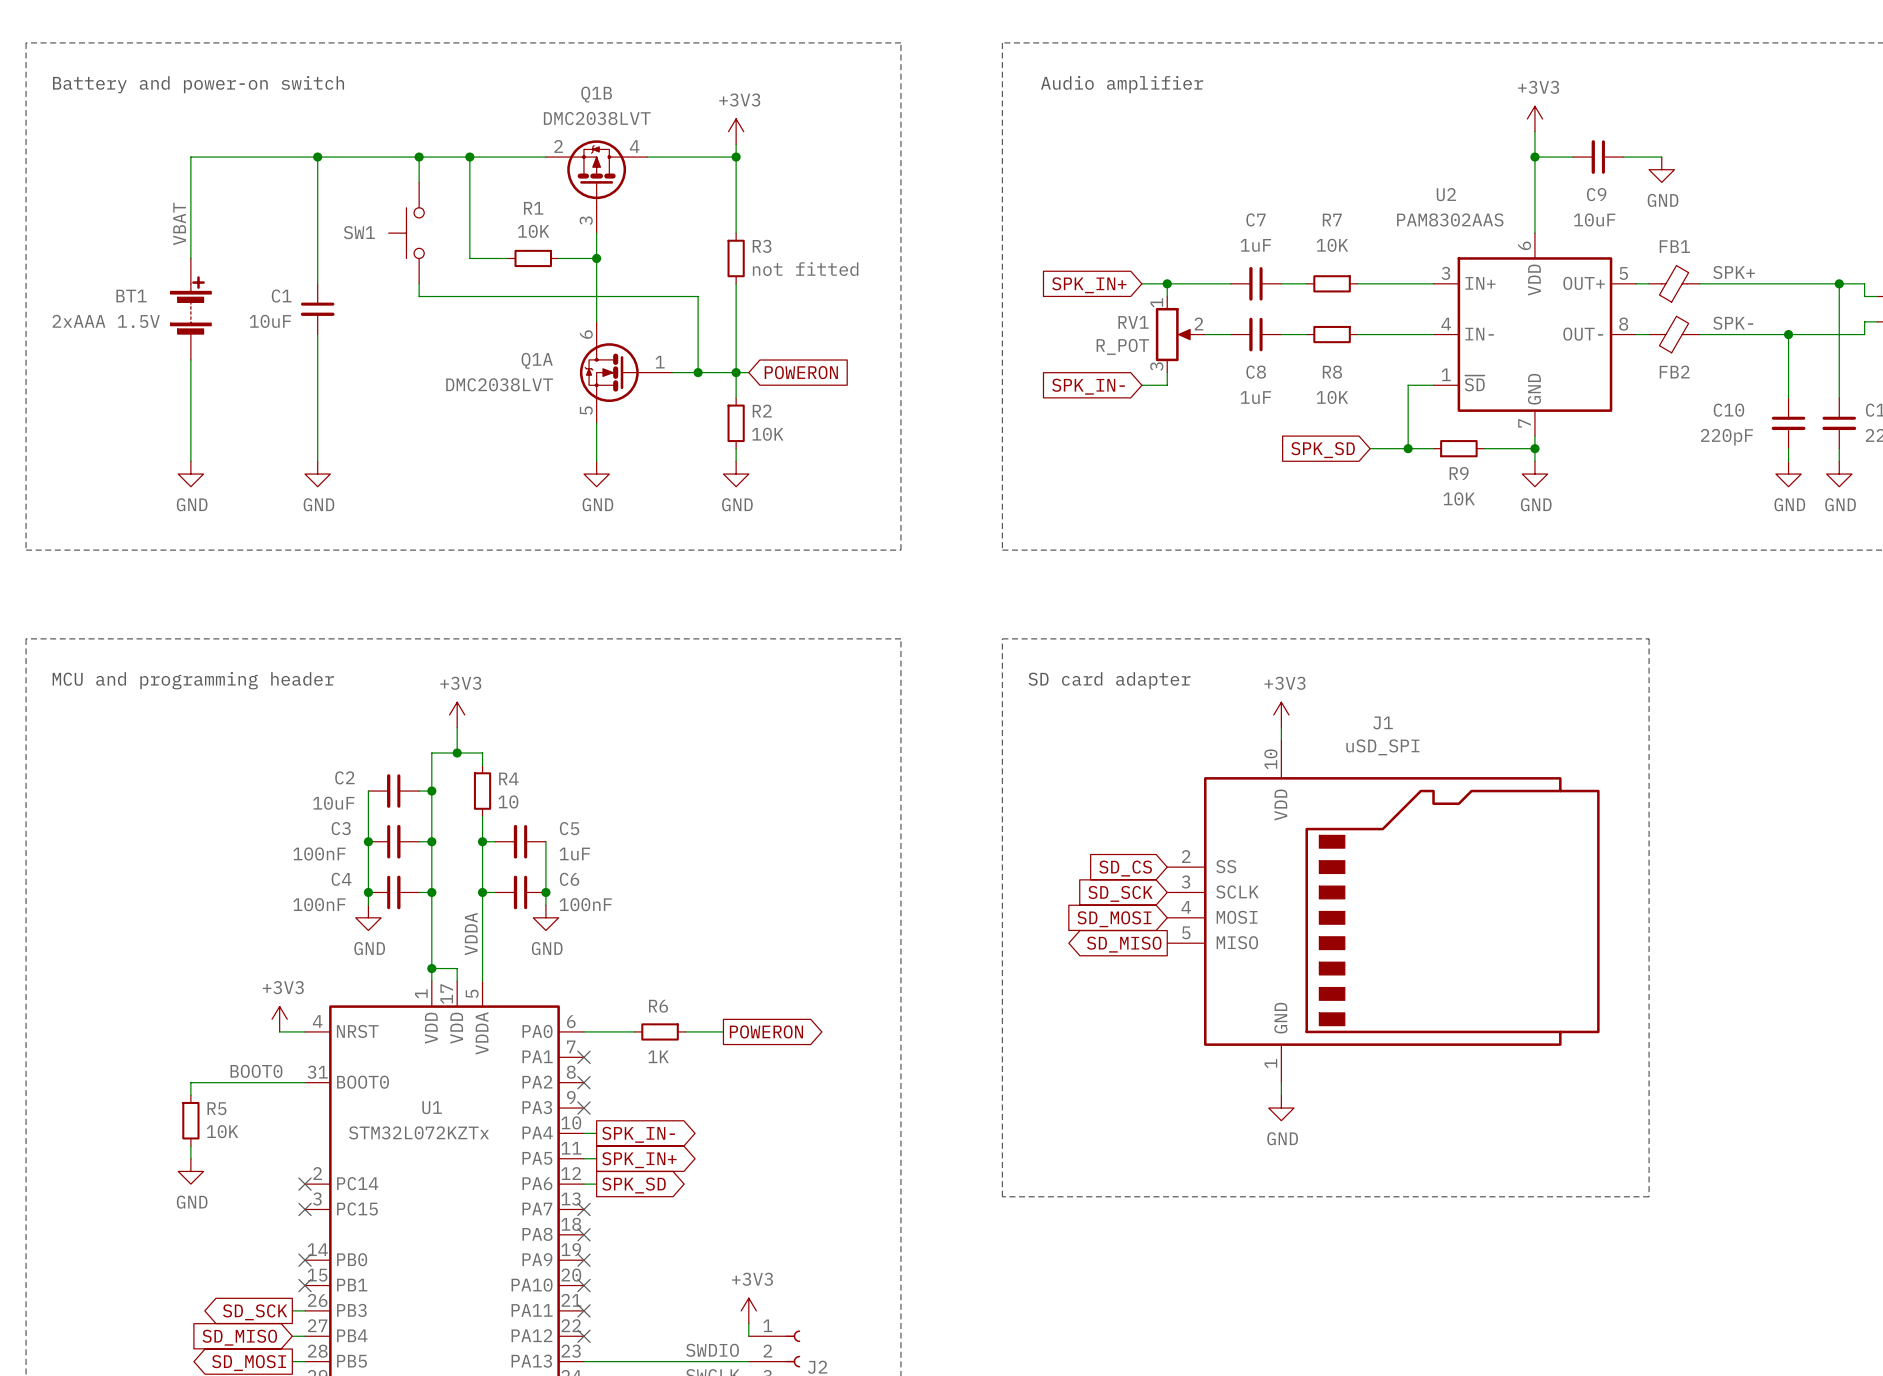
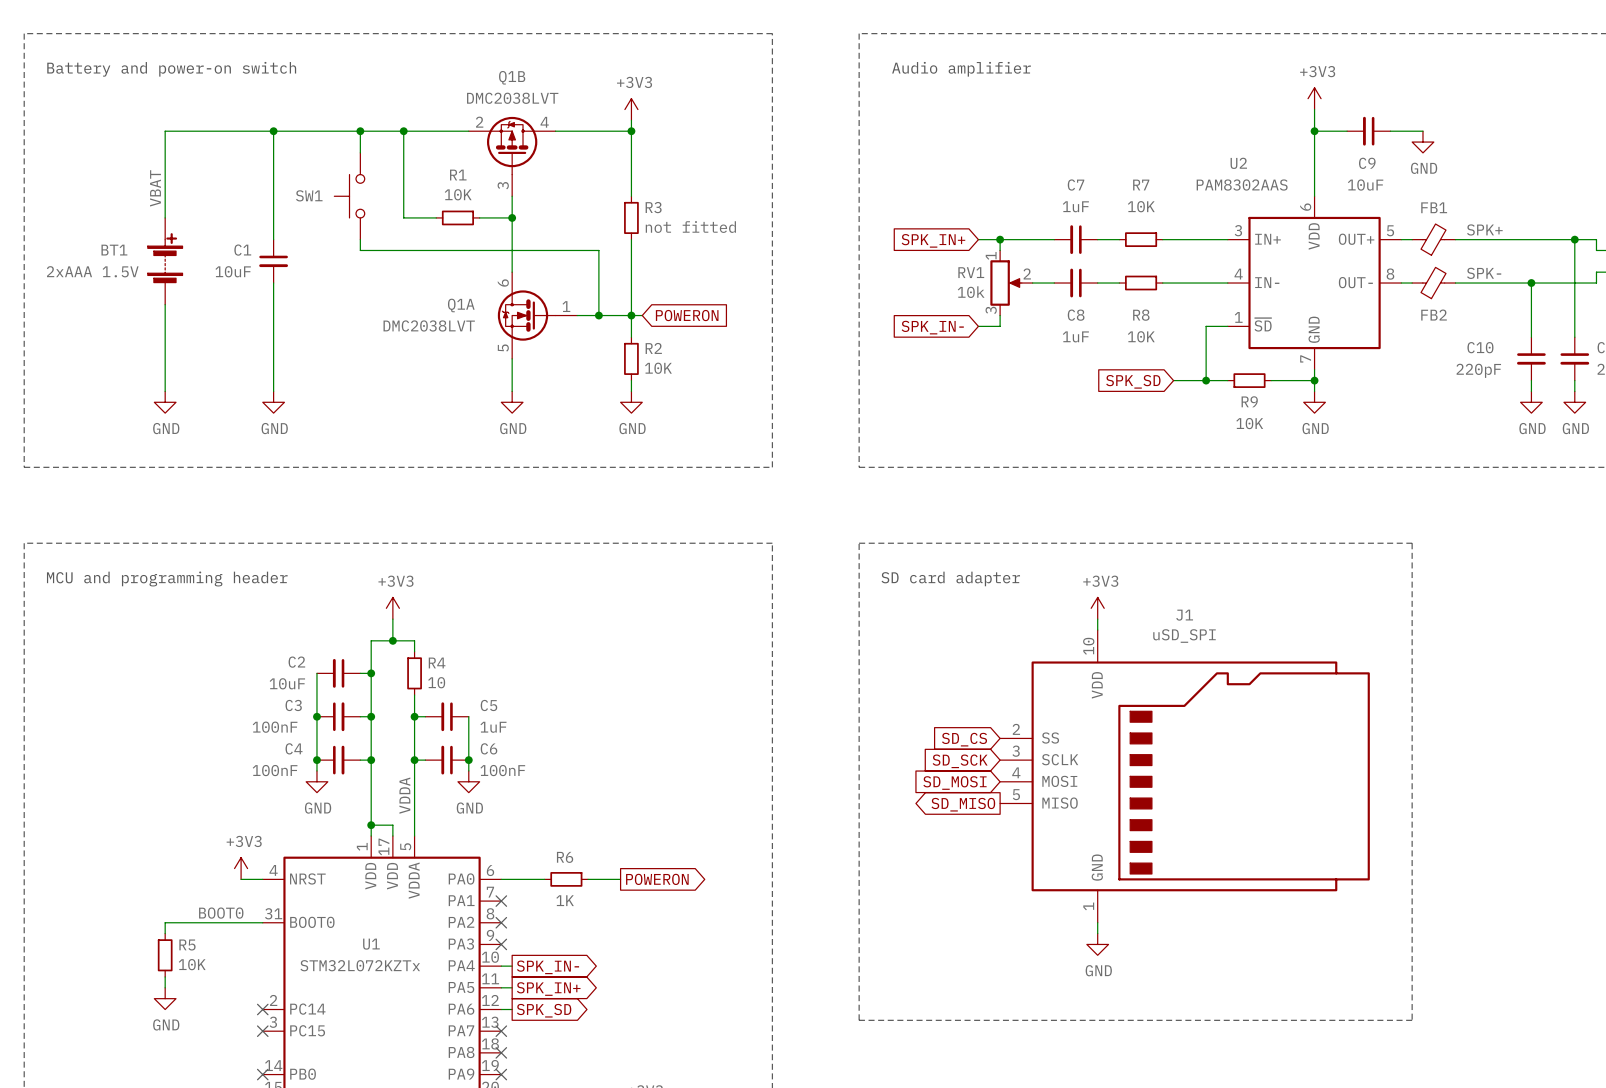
RV1 value: R_POT (1122, 346) -> 10k (971, 292)

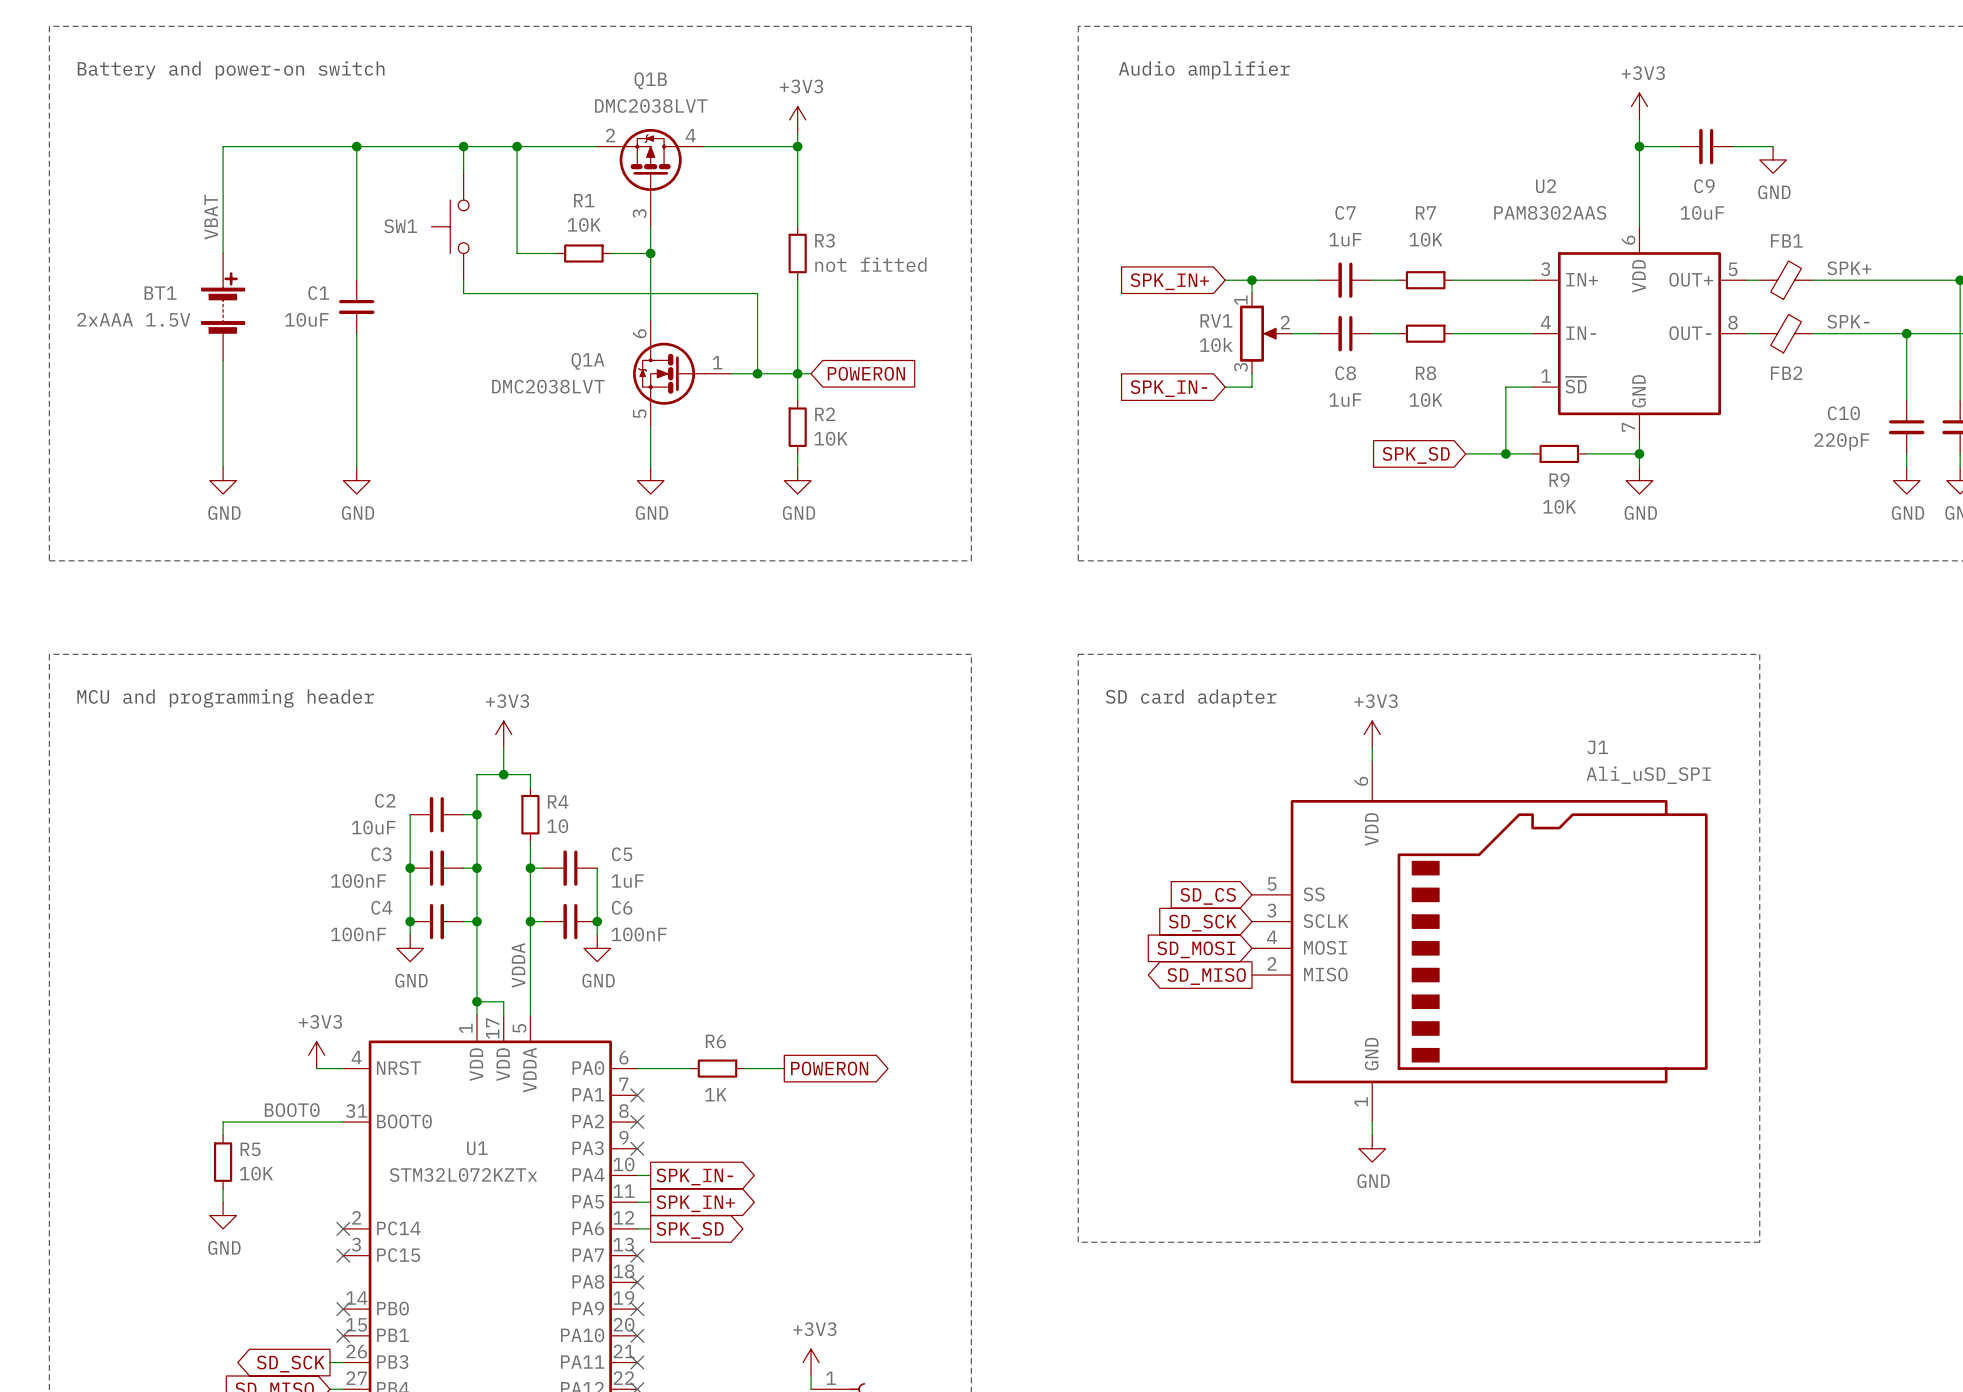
J1 name position: J1 (1184, 615) -> J1 (1597, 747)
J1 value: uSD_SPI (1184, 636) -> Ali_uSD_SPI (1648, 775)
J1 pin number: 10 (1088, 646) -> 6 (1361, 781)
J1 pin number: 2 (1016, 729) -> 5 (1272, 883)
J1 pin number: 5 (1016, 794) -> 2 (1272, 963)

